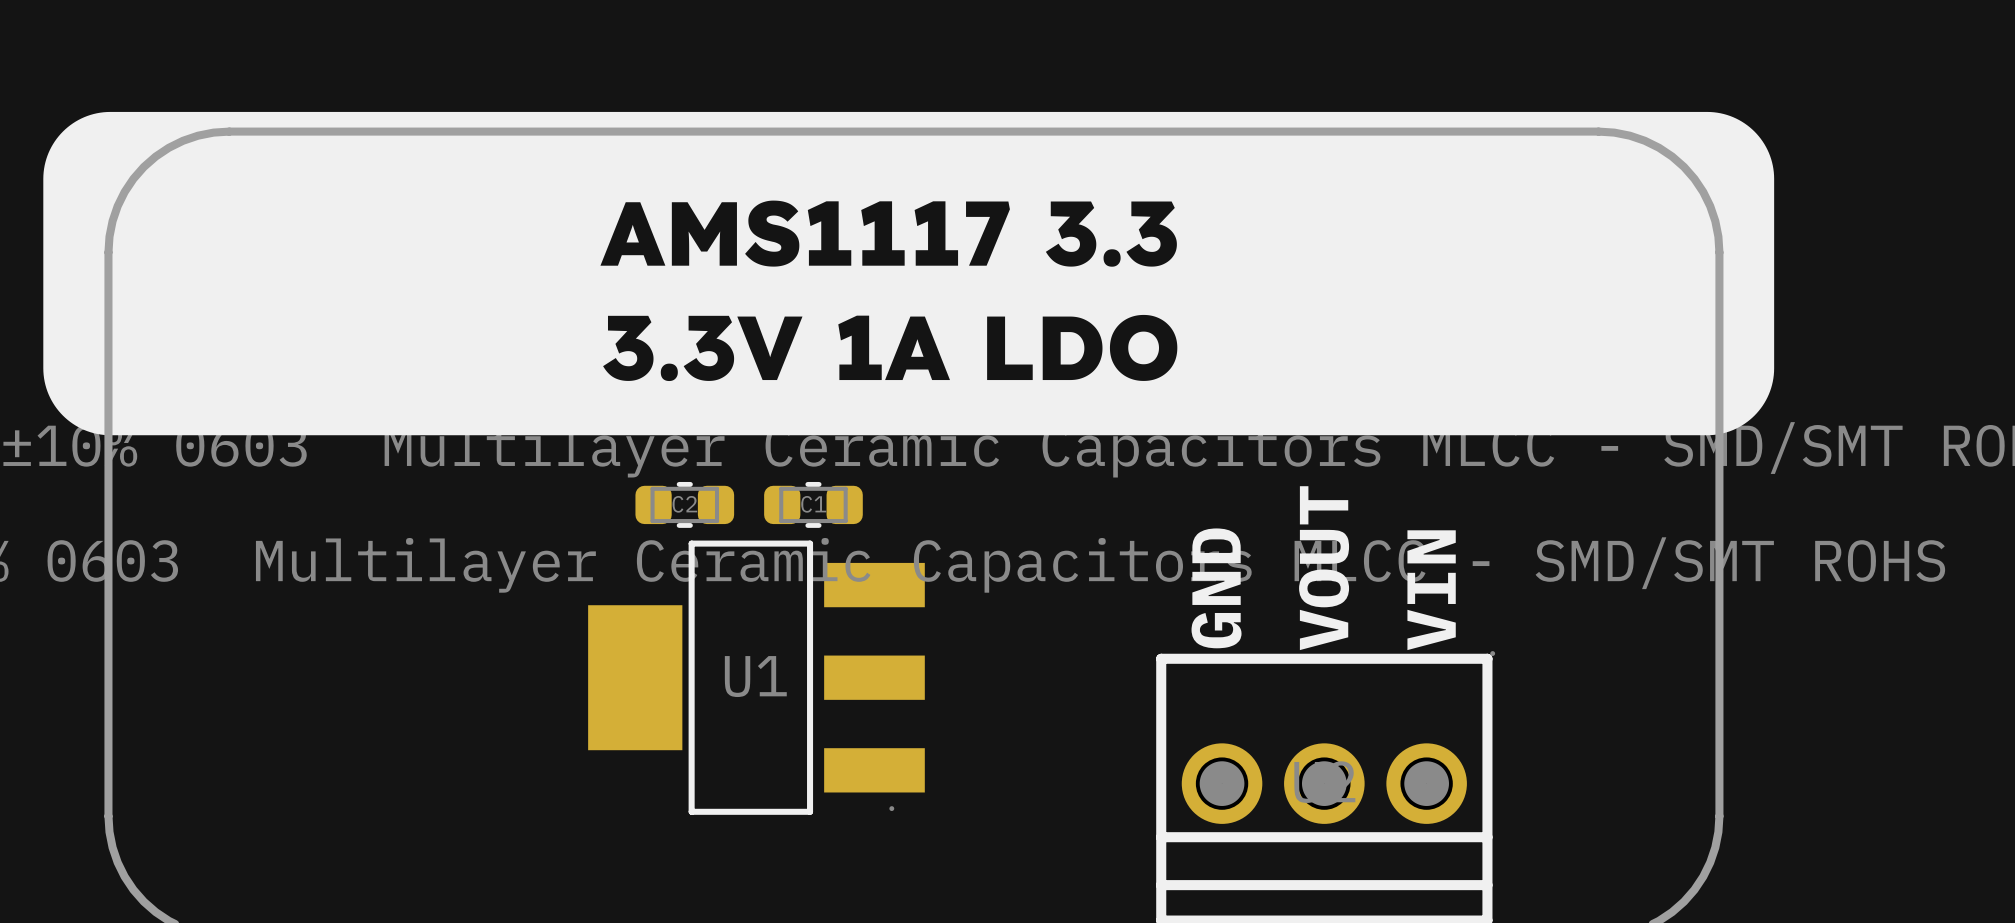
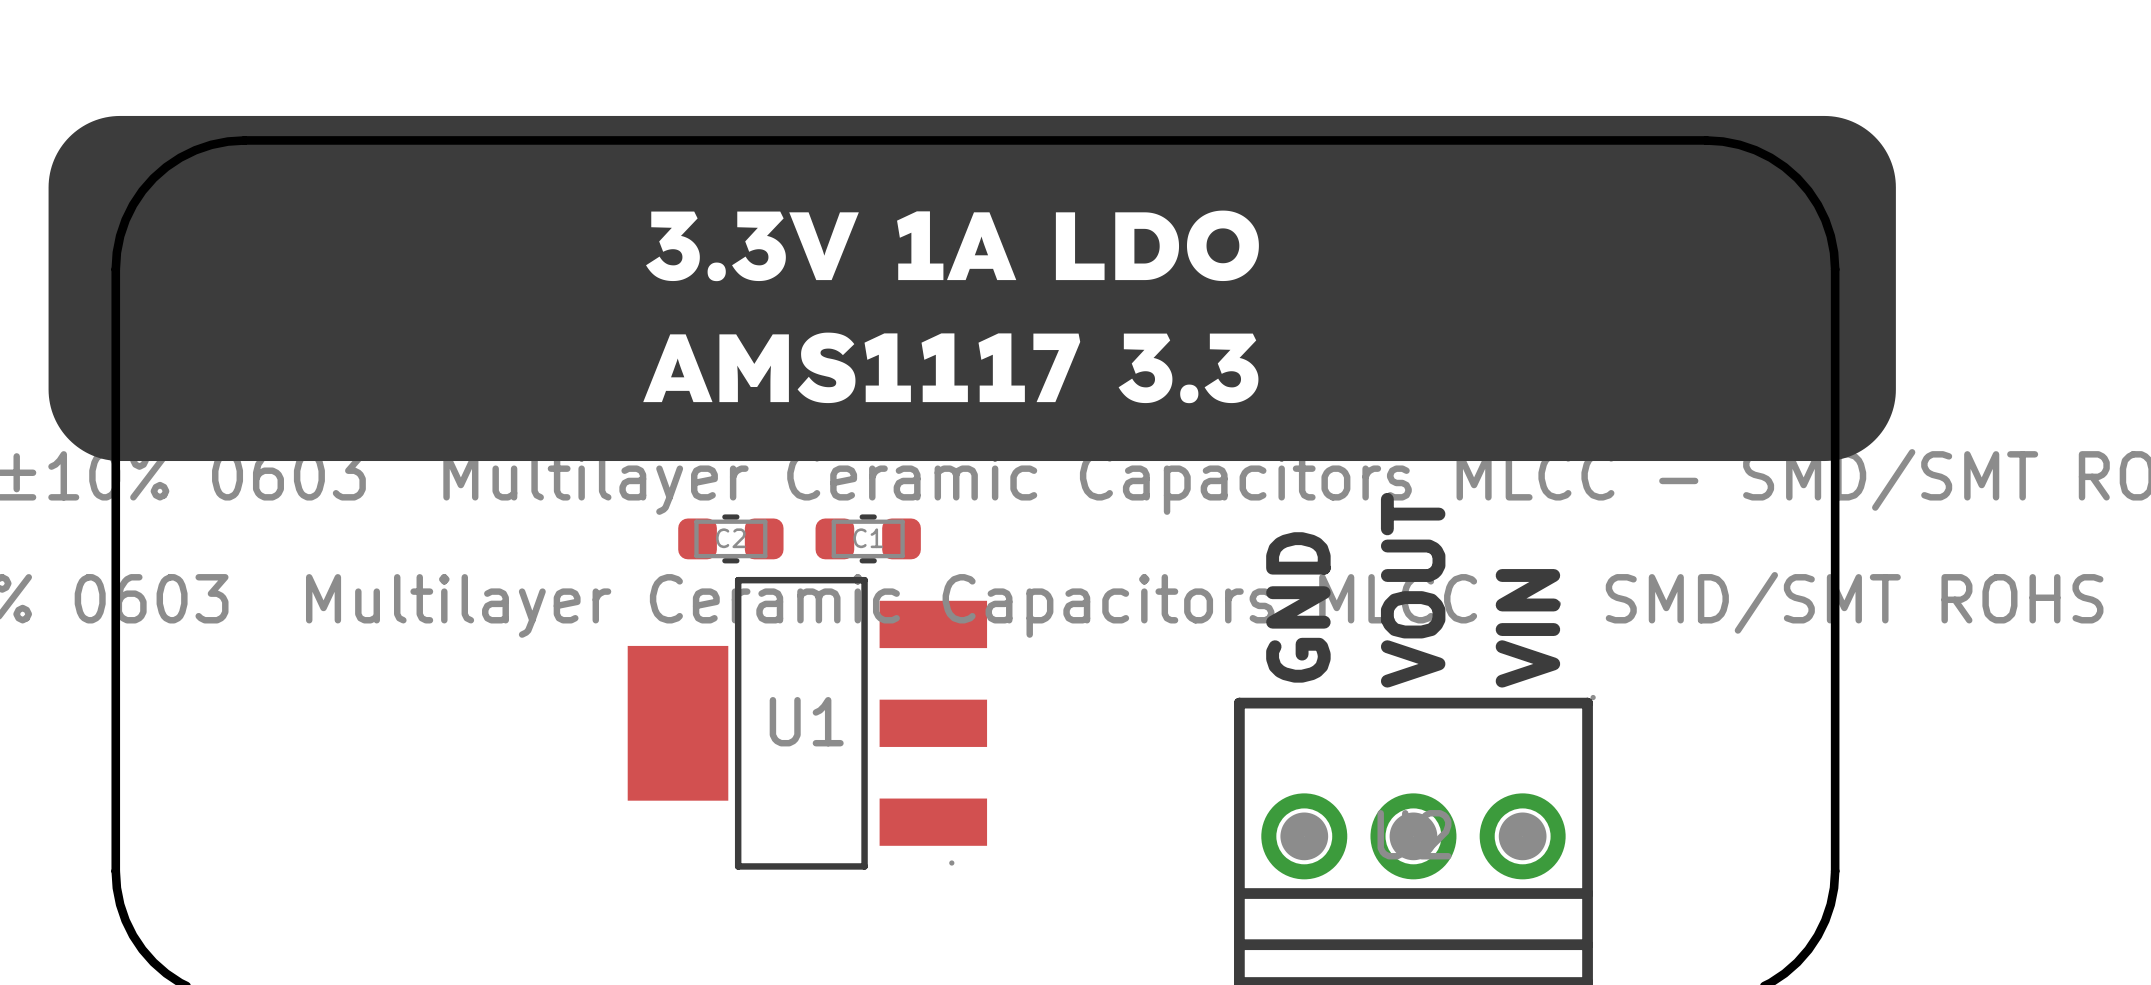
drawing shape: [43, 111, 1775, 436] -> [48, 115, 1896, 462]
drawing position: (632, 233) -> (677, 367)
drawing position: (917, 347) -> (981, 245)
drawing position: (1143, 347) -> (1222, 245)
drawing position: (1072, 348) -> (1147, 246)

